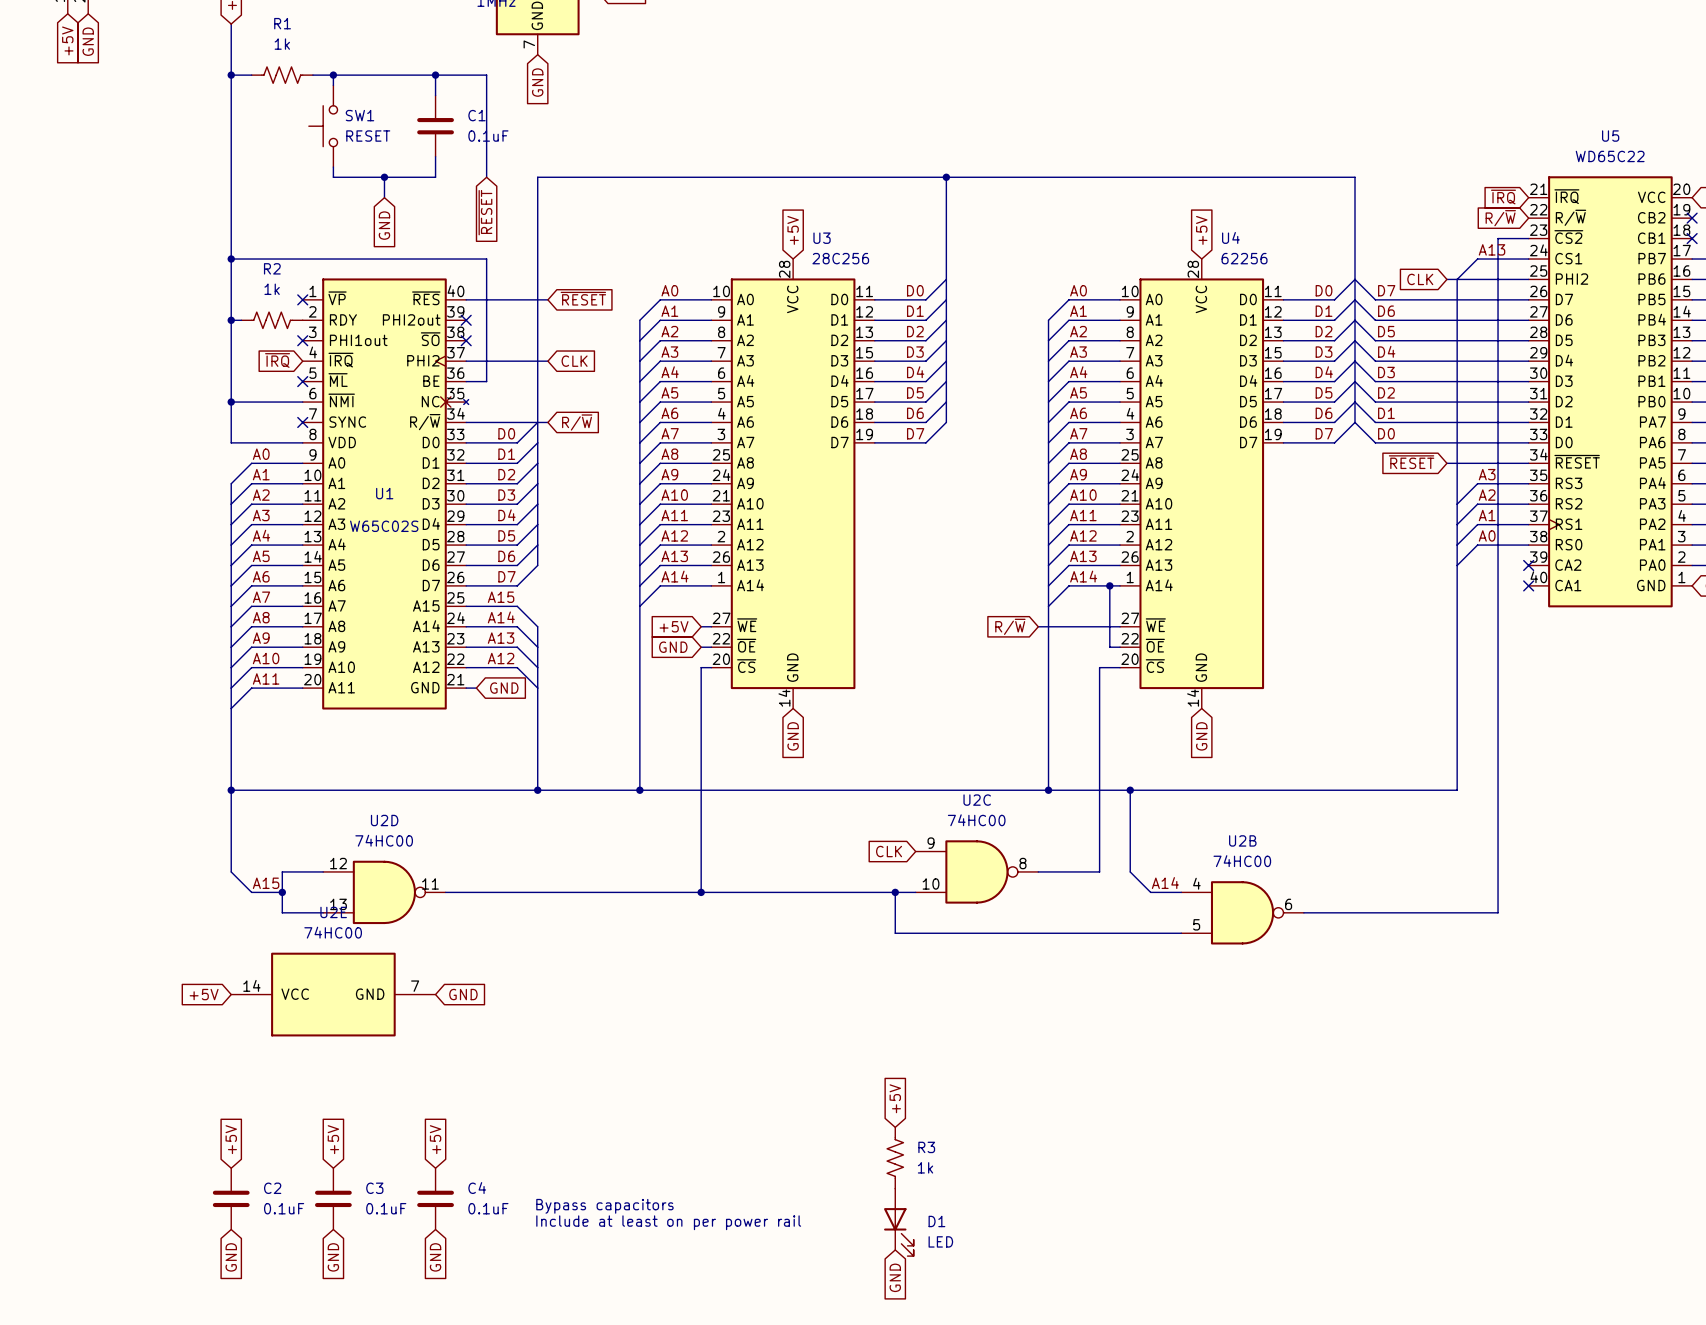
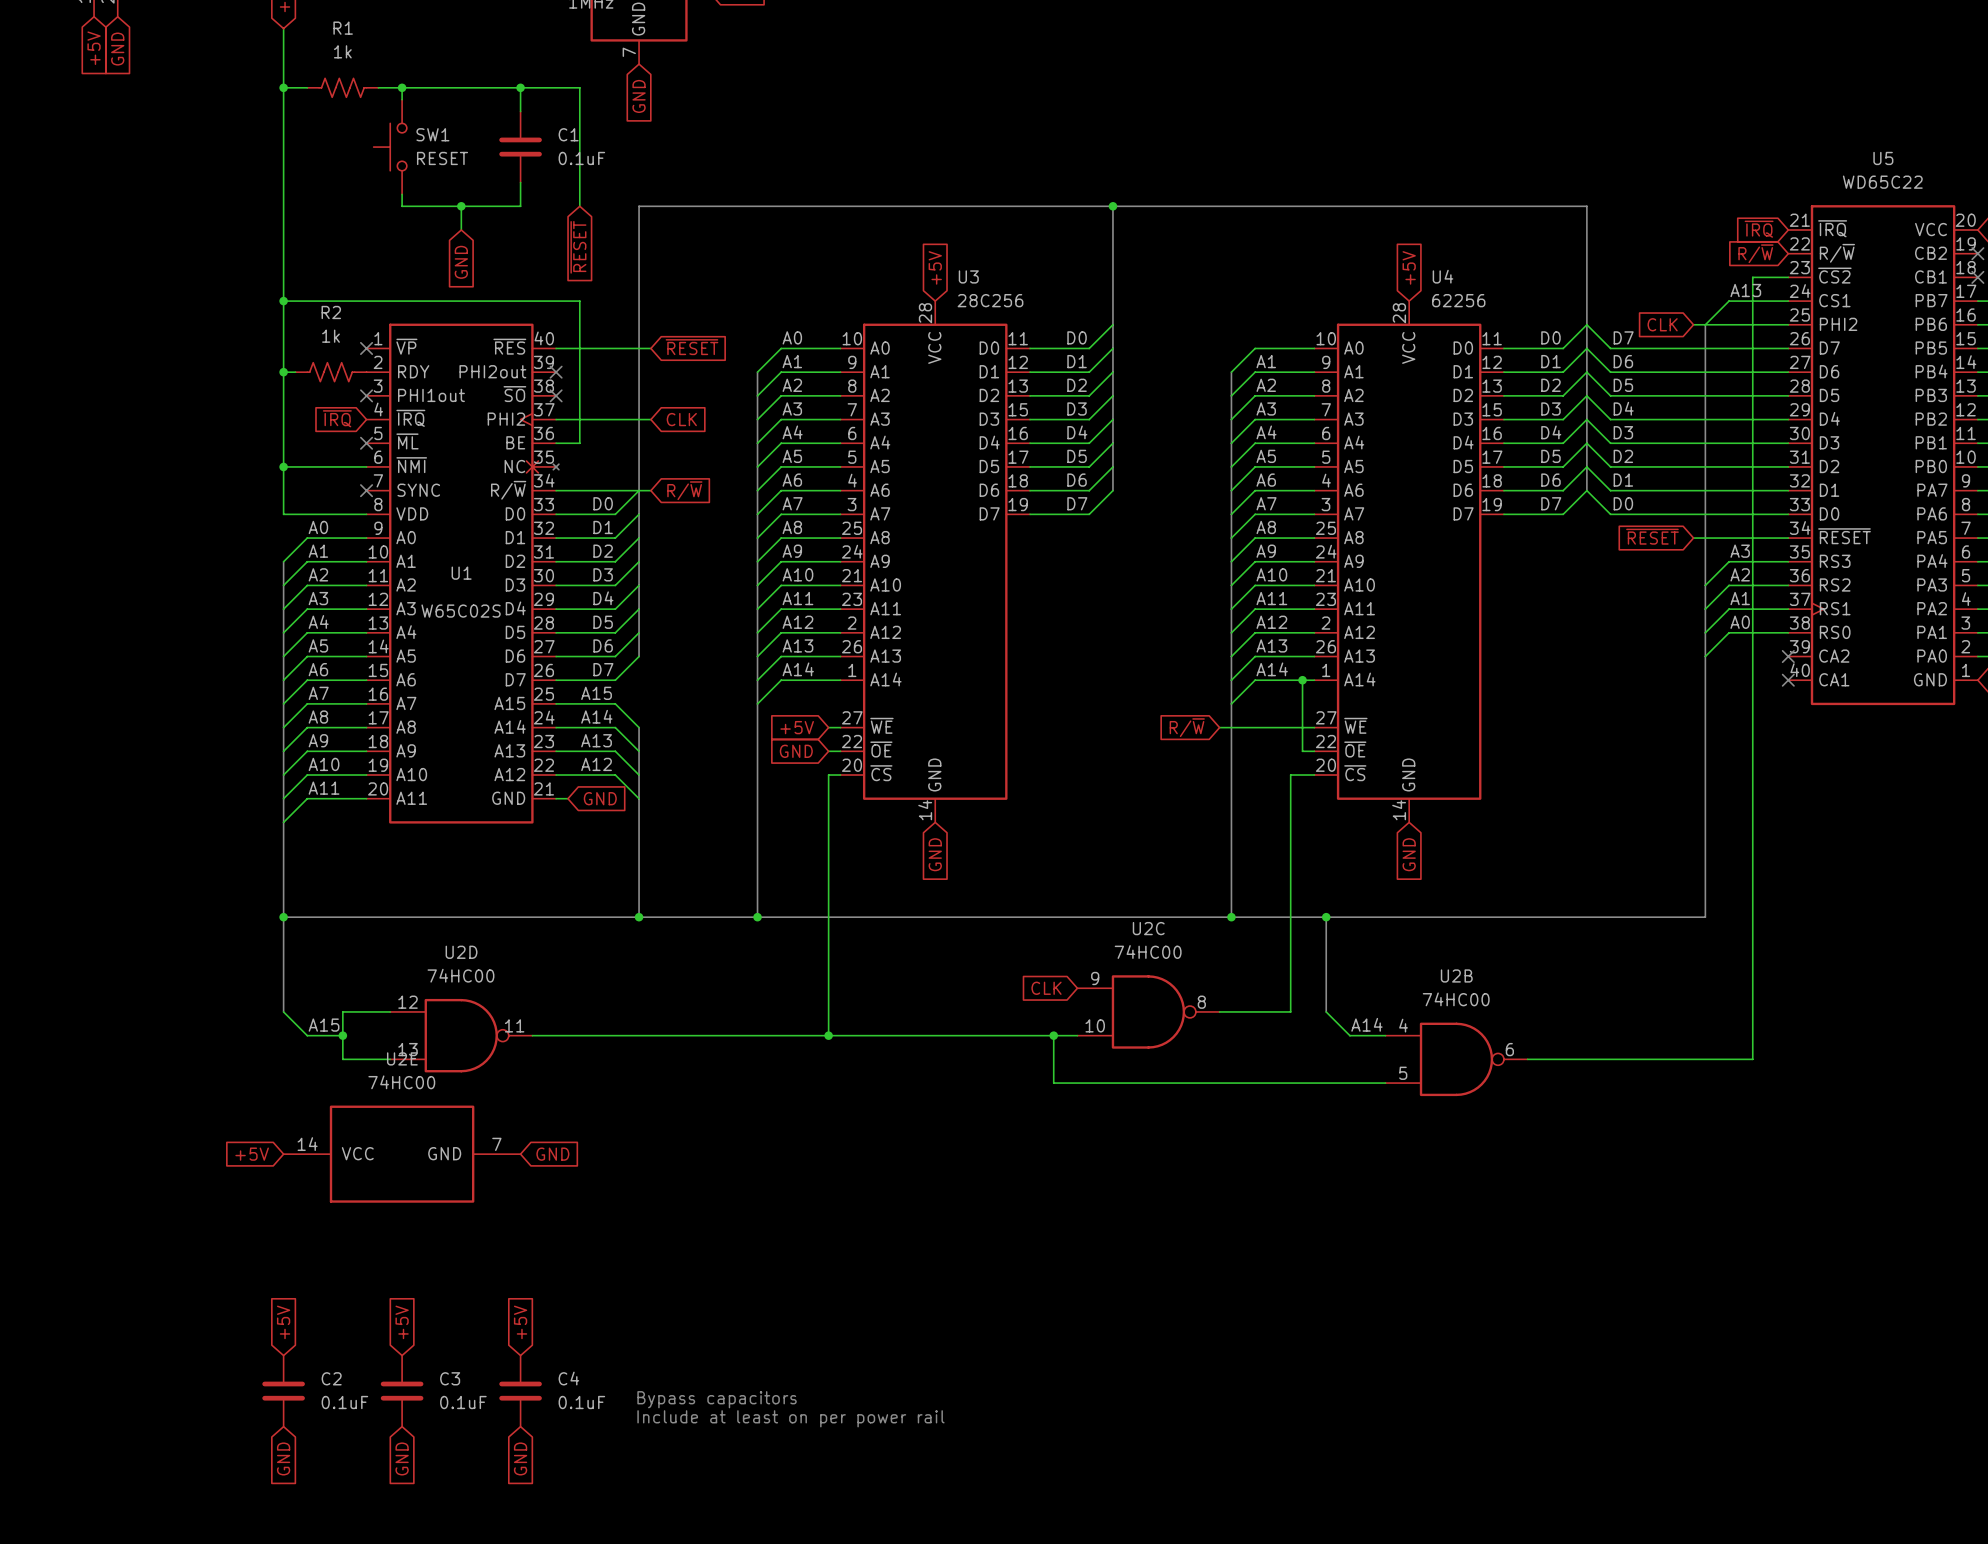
label: A0 (1078, 290) -> none
global label: +5V (895, 1098) -> none
R3: 1k (895, 1158) -> none
D1: LED (898, 1222) -> none
global label: GND (895, 1277) -> none

